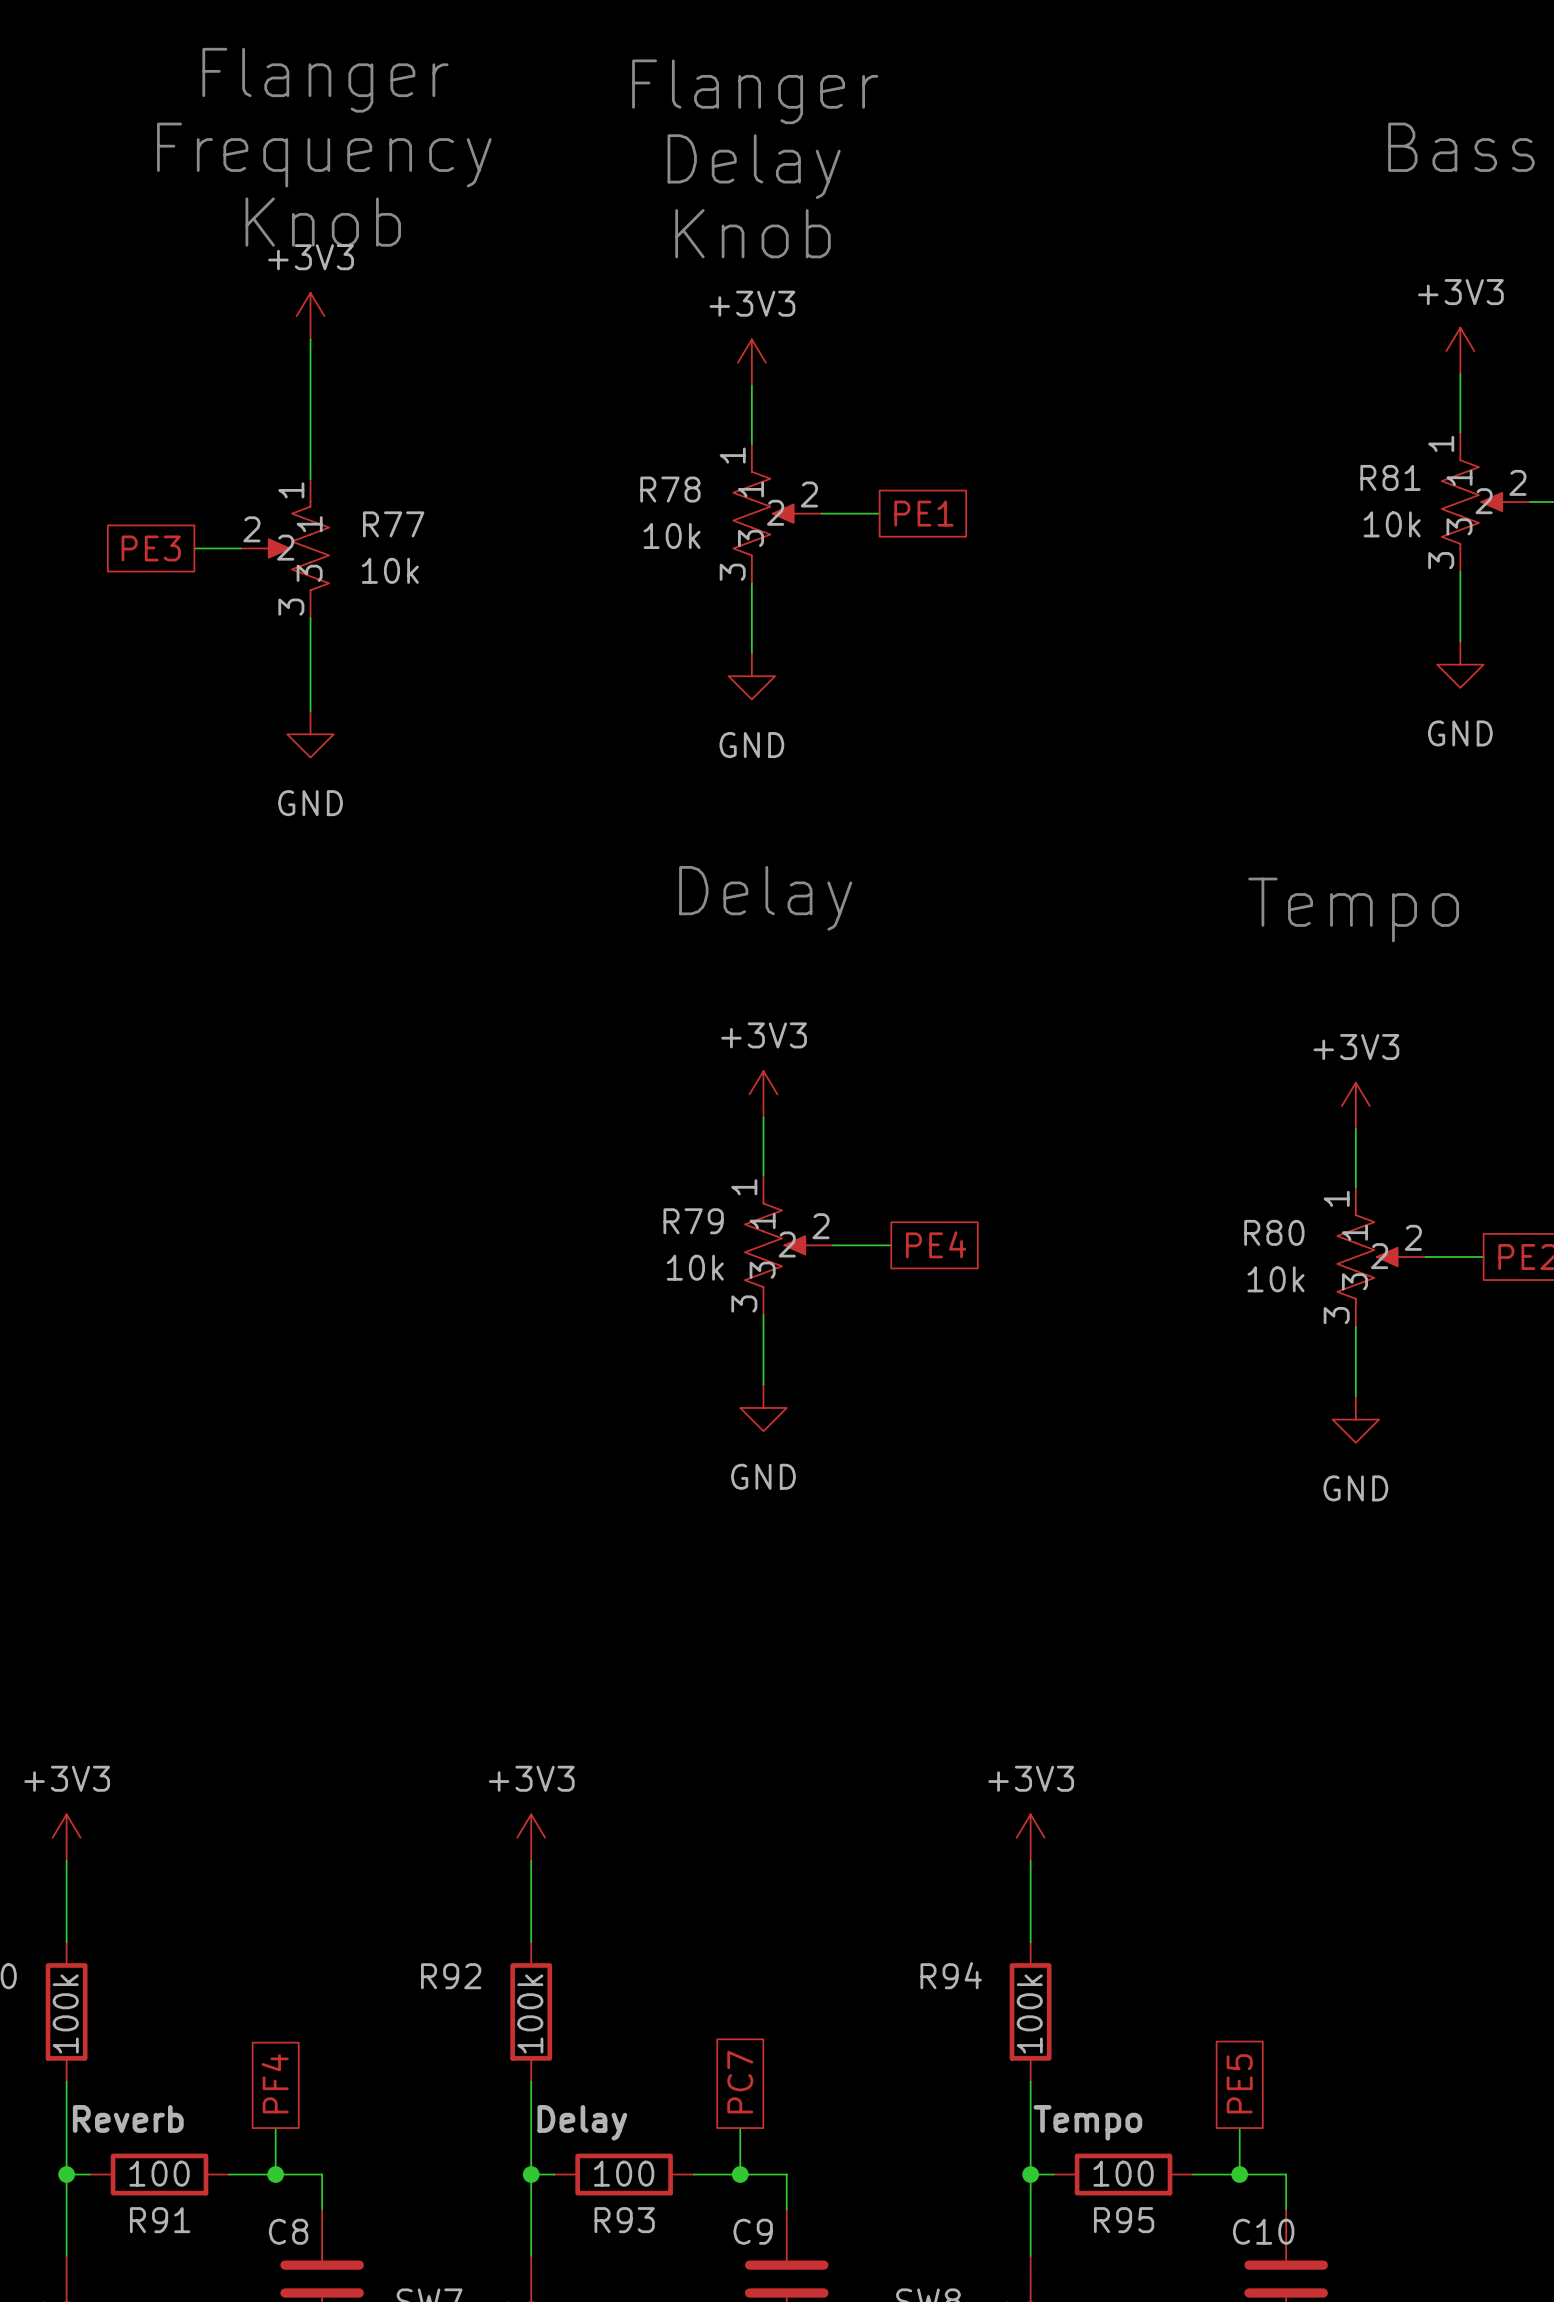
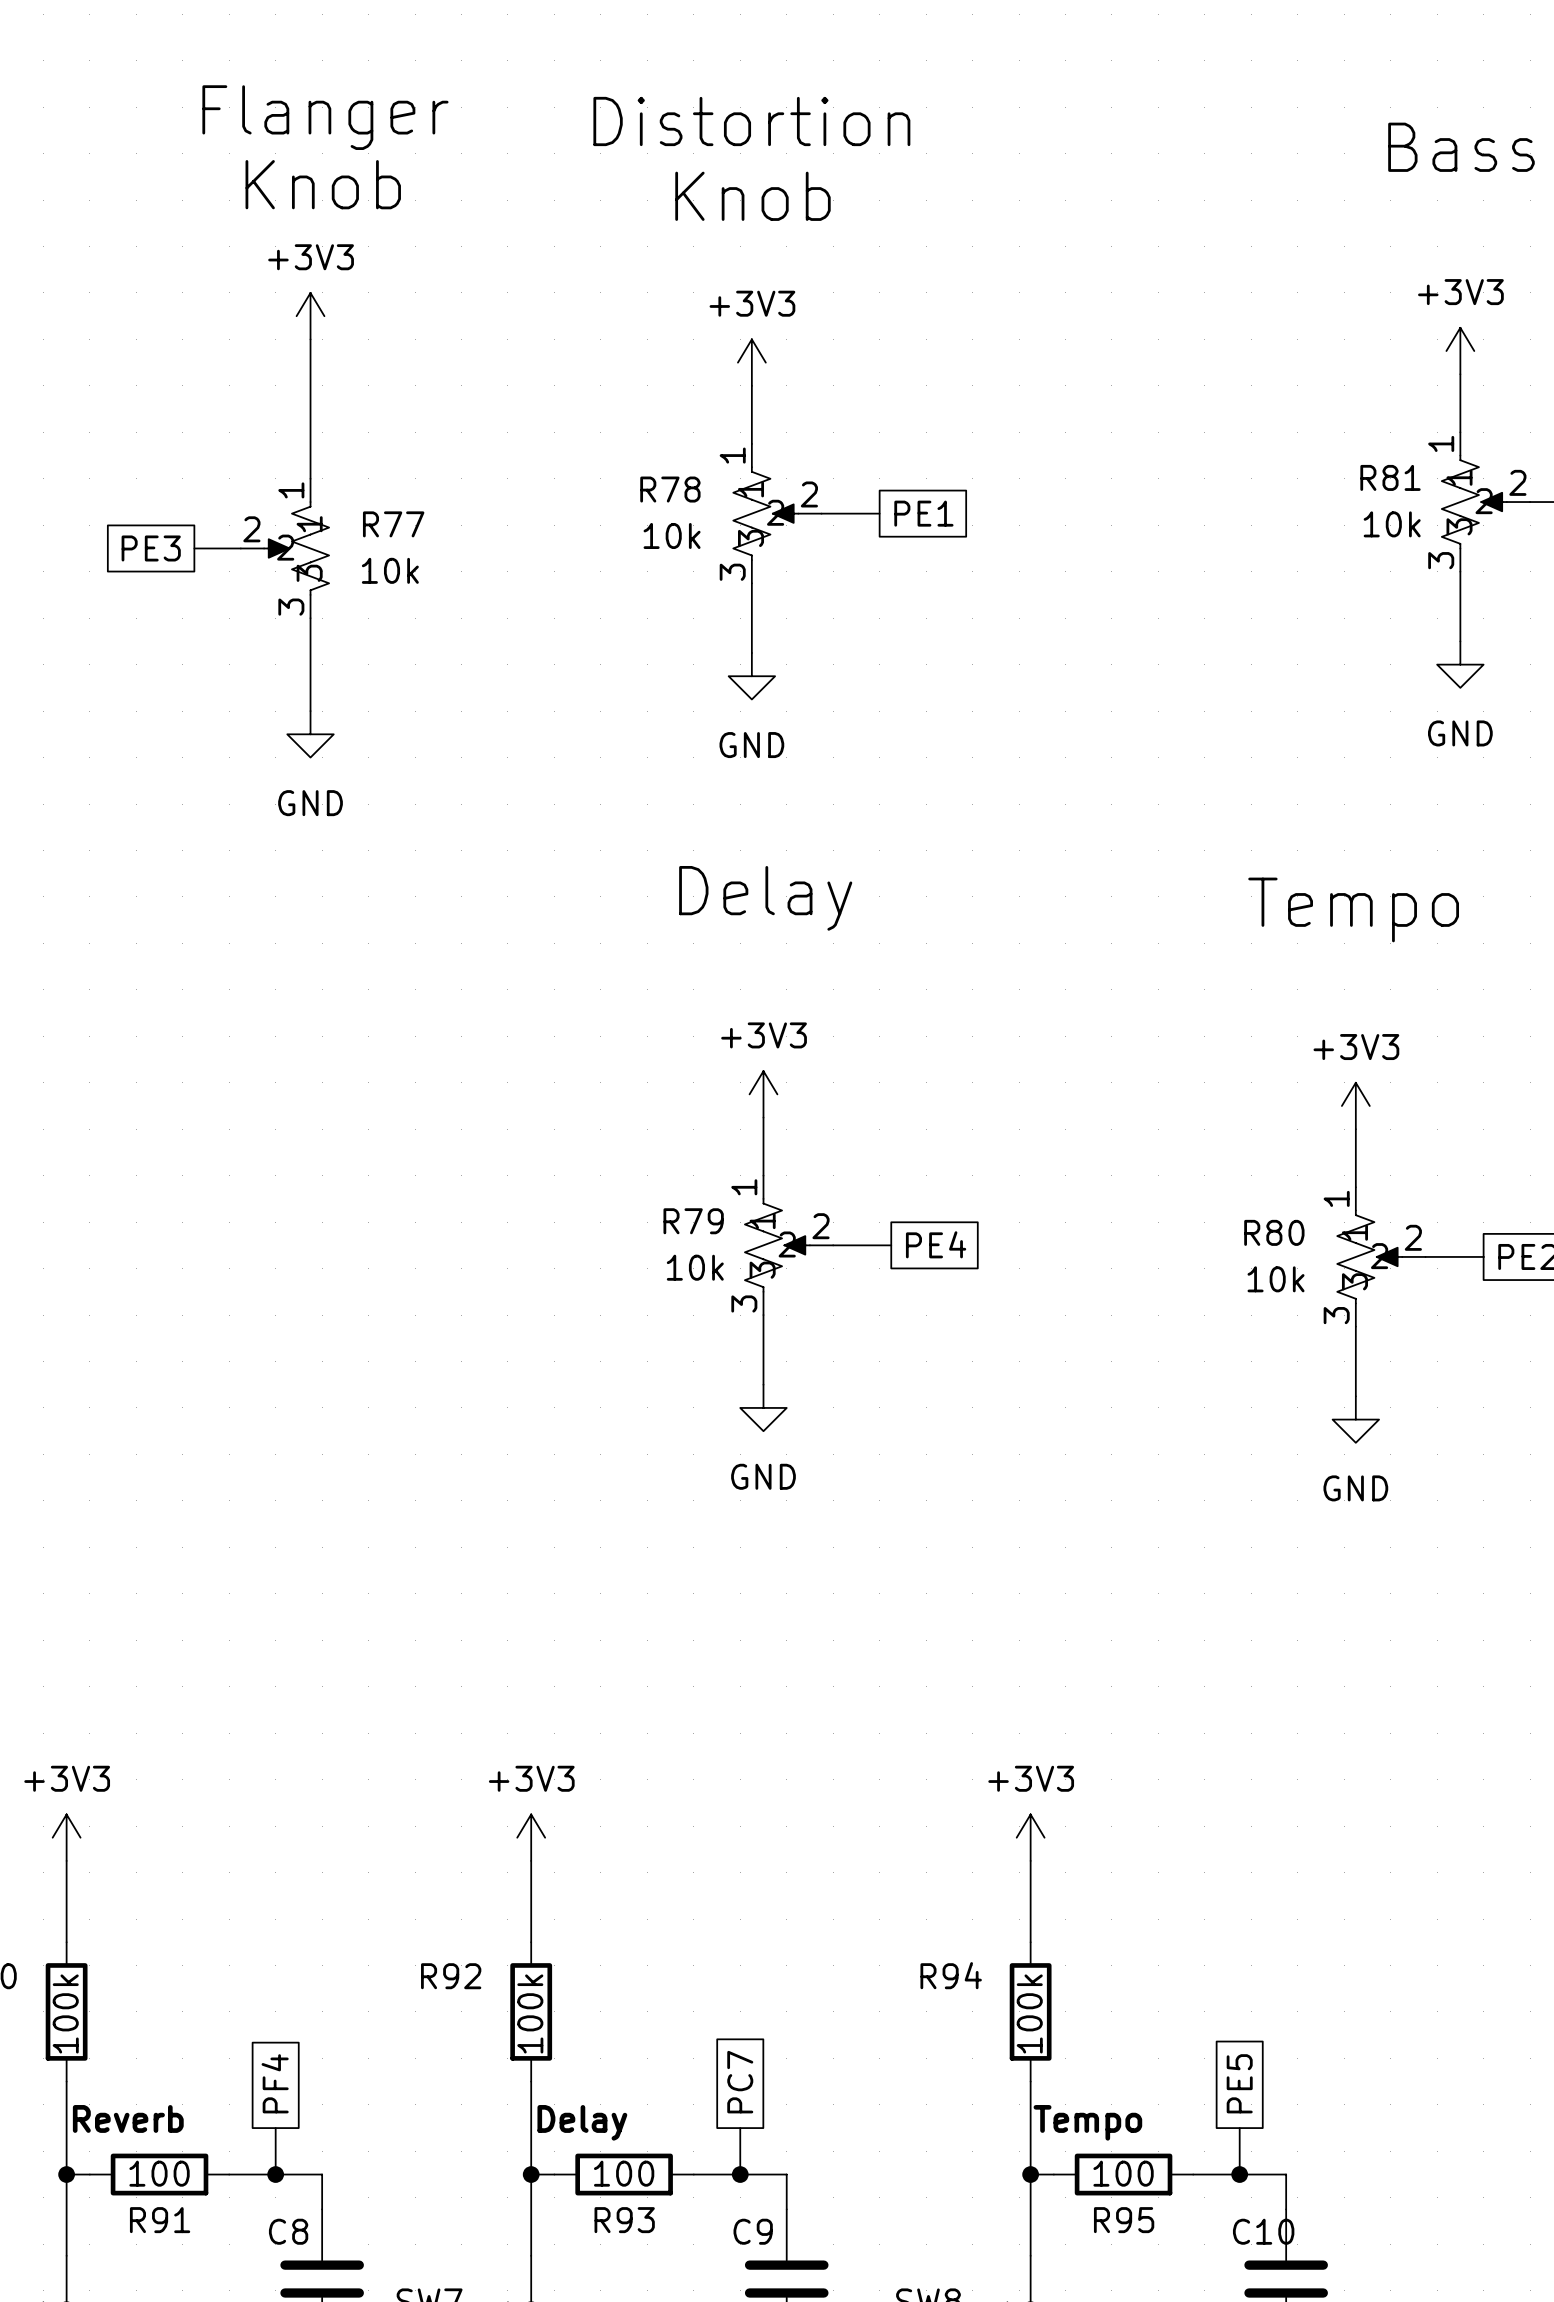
text position: Flanger (325, 80) -> Flanger (325, 117)
text: Flanger (755, 91) -> none
text: none -> Distortion (751, 121)
text: Frequency (324, 155) -> none
text: Delay (754, 166) -> none
text position: Knob (323, 222) -> Knob (323, 184)
text position: Knob (752, 233) -> Knob (752, 196)

